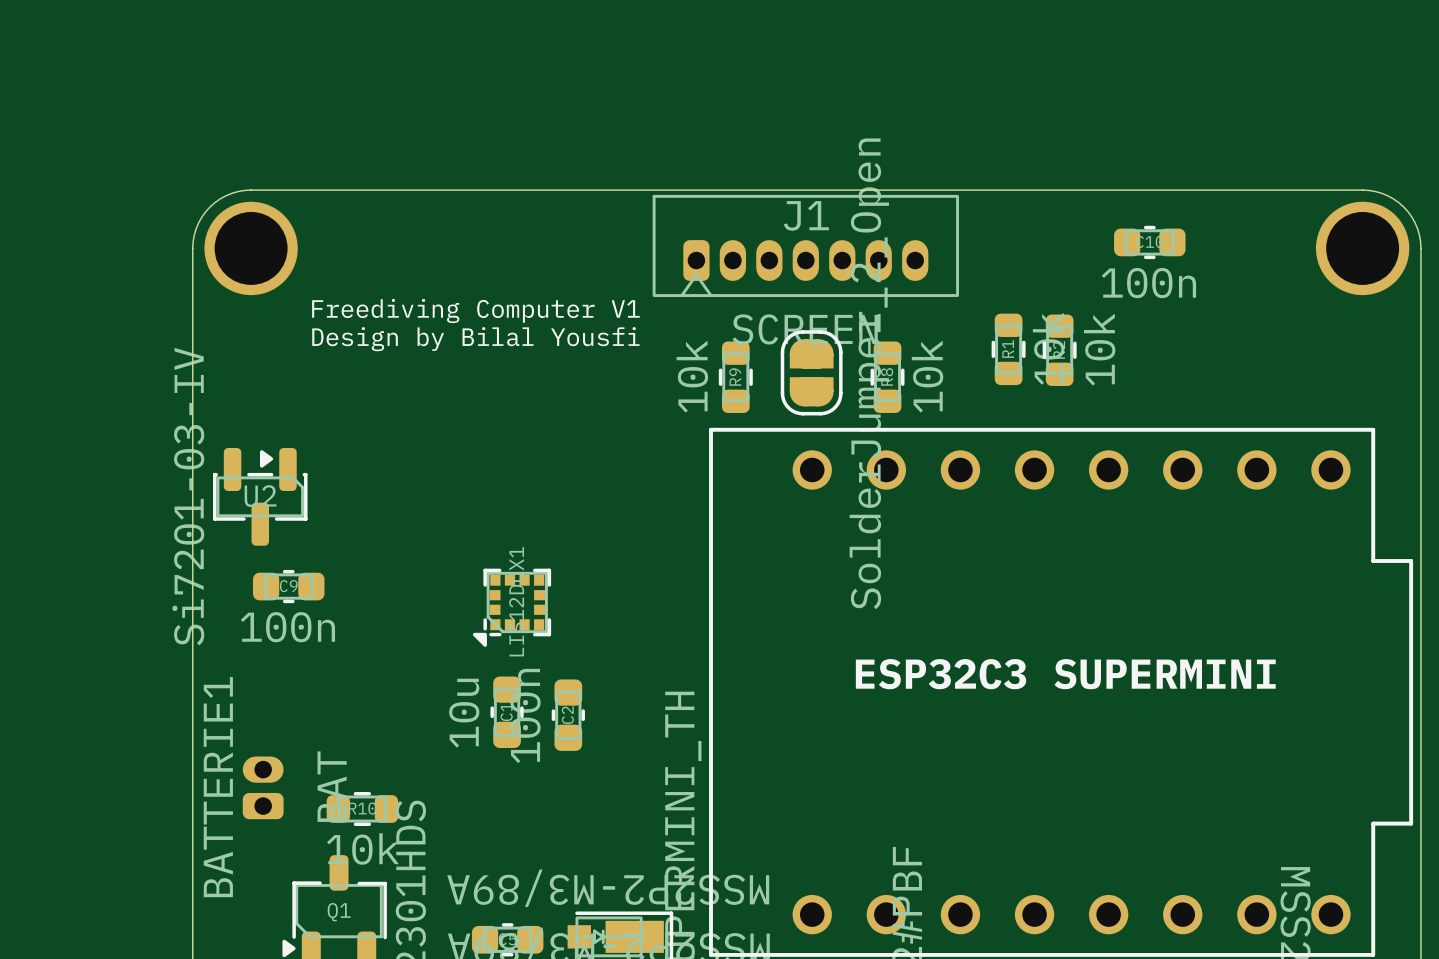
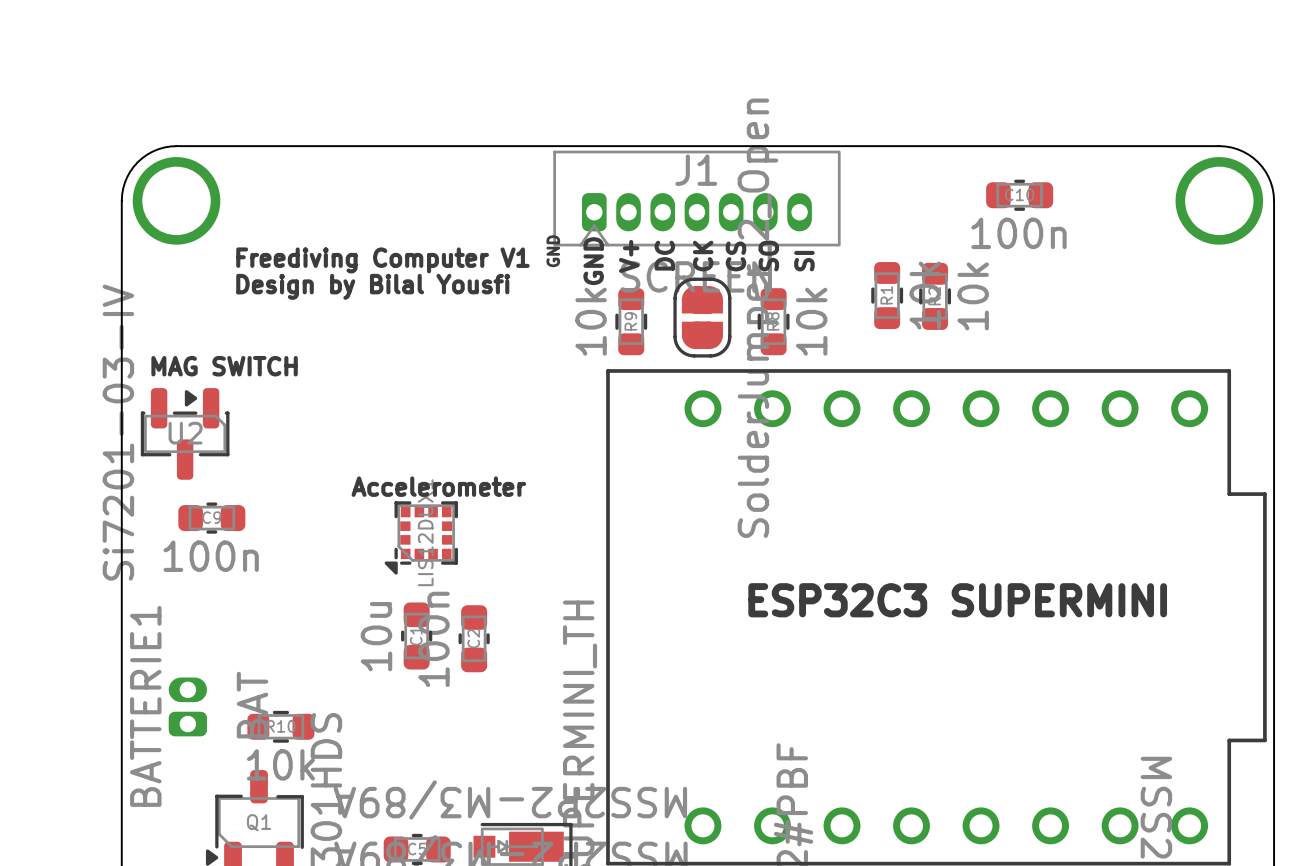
text: none -> GND (553, 251)
text: none -> CK (703, 256)
text: none -> V+ (629, 256)
text: none -> DC (664, 255)
text: none -> CS (735, 256)
text: none -> SO (768, 256)
text: none -> SI (804, 261)
text: none -> GND (593, 261)
text: none -> MAG SWITCH (224, 366)
text: none -> Accelerometer (438, 486)

